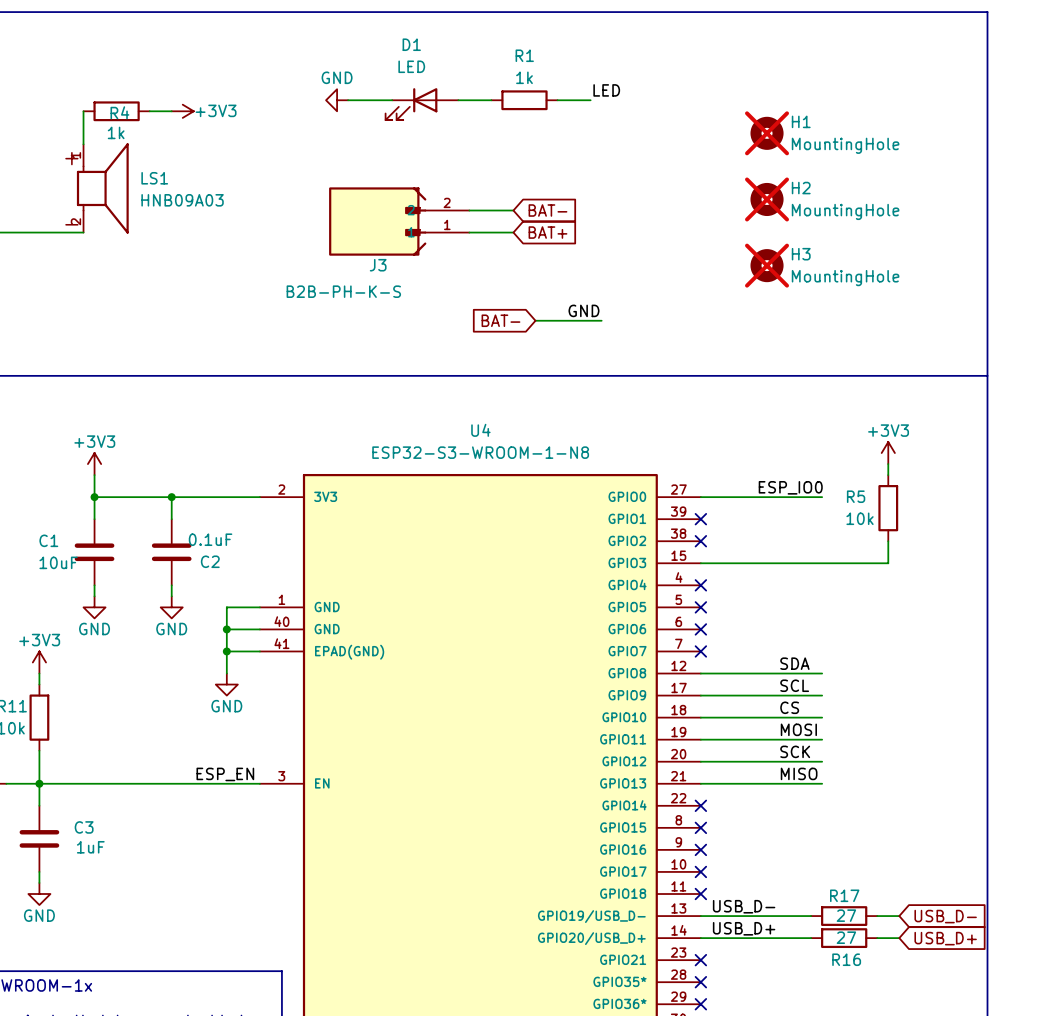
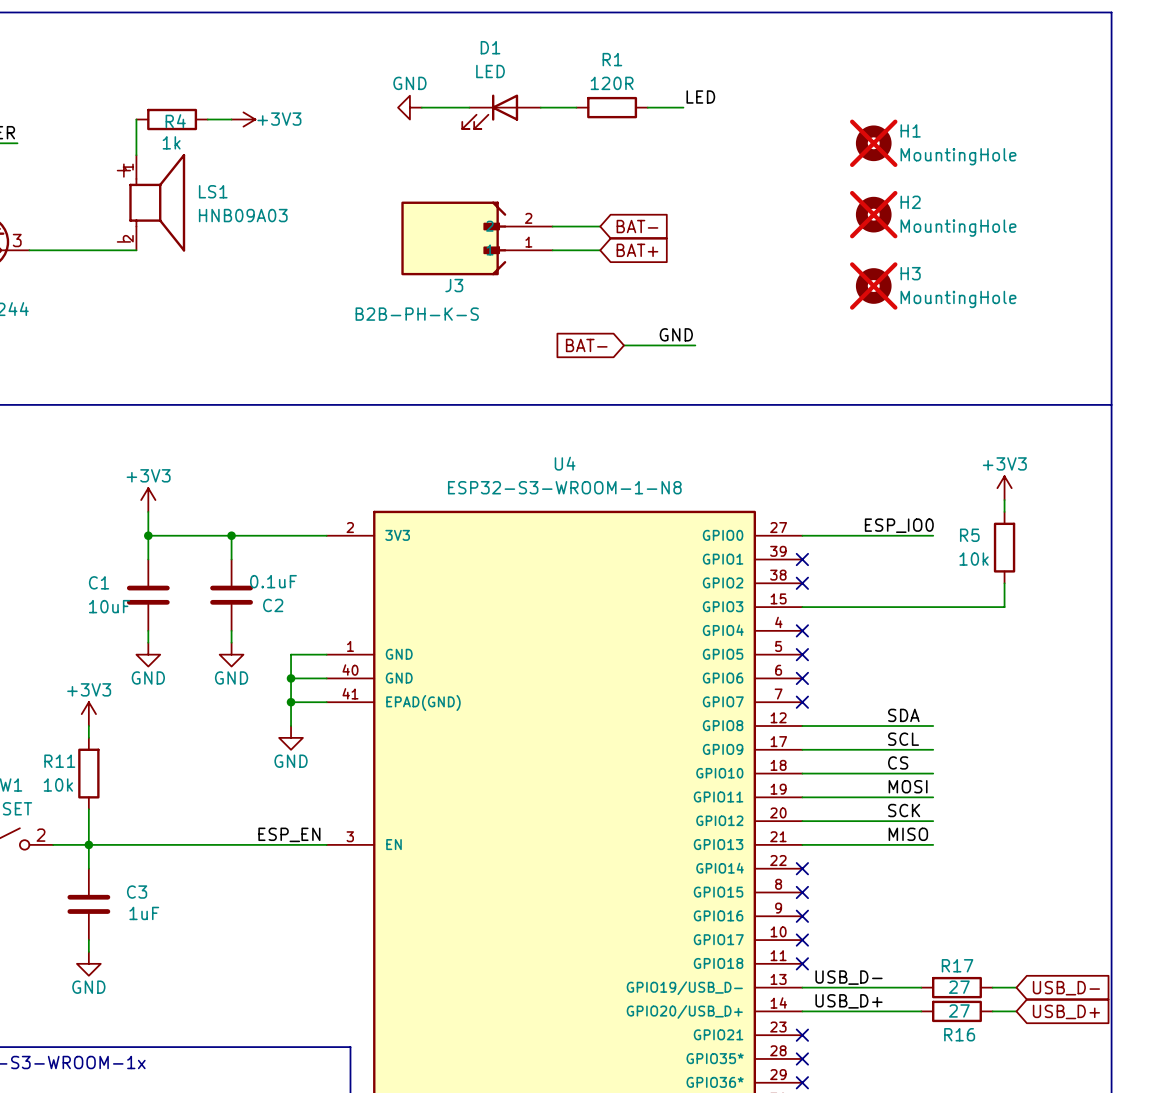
R1 value: 1k (524, 77) -> 120R (612, 83)

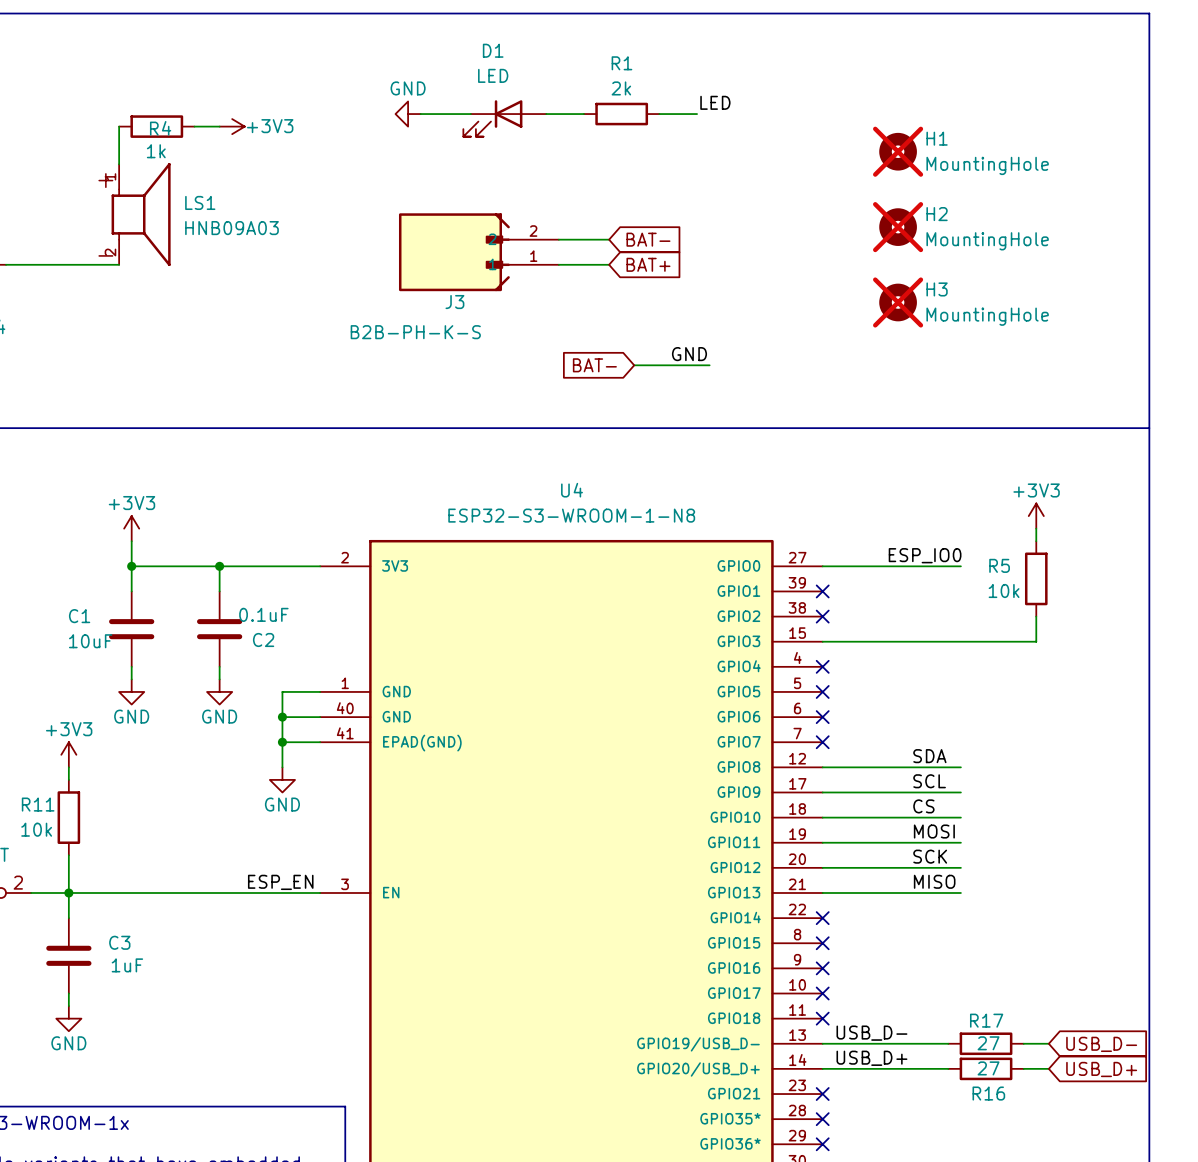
R1 value: 120R (612, 83) -> 2k (621, 88)

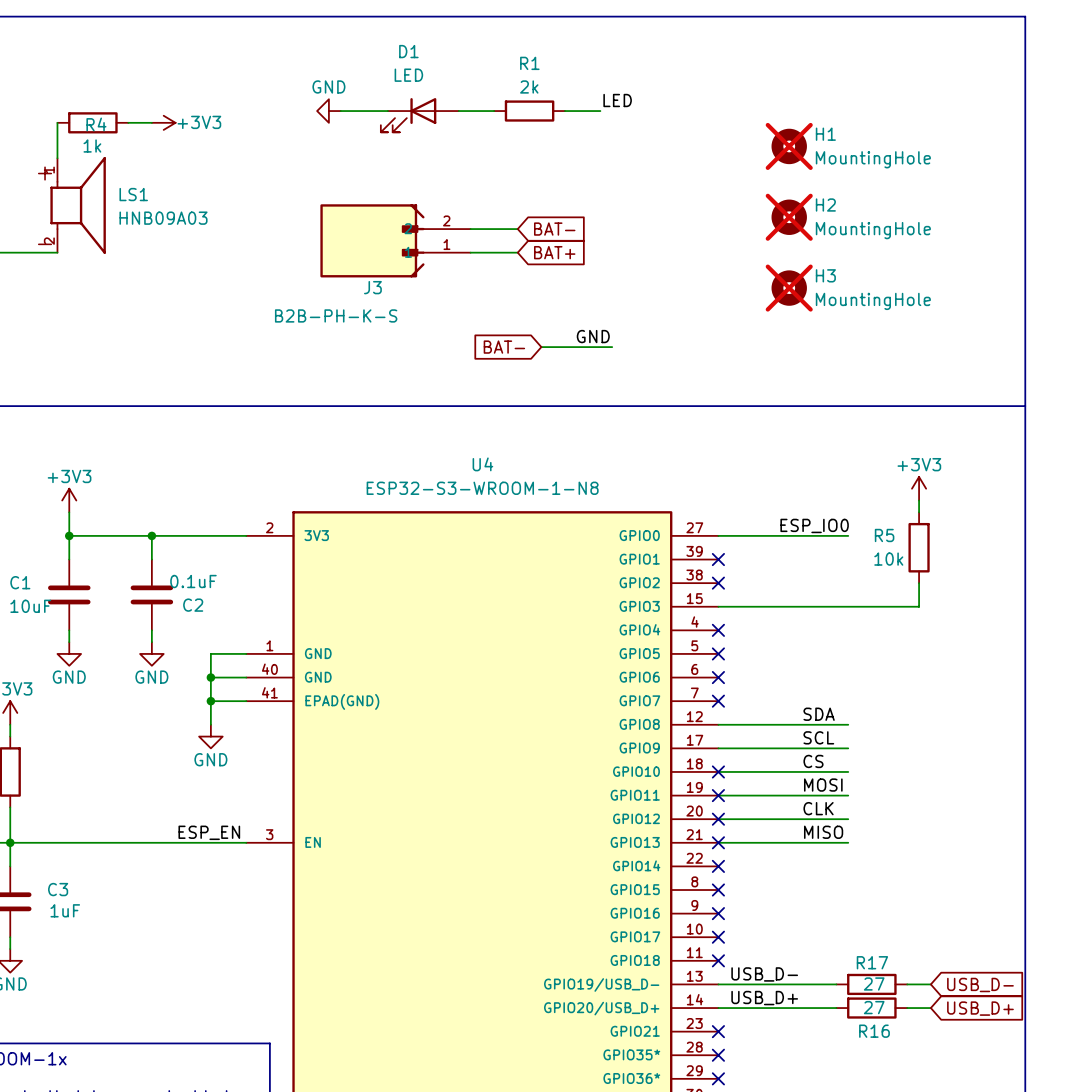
no-connect mark: none -> (718, 771)
no-connect mark: none -> (718, 795)
label: SCK (930, 856) -> CLK (818, 808)
no-connect mark: none -> (718, 819)
no-connect mark: none -> (718, 842)

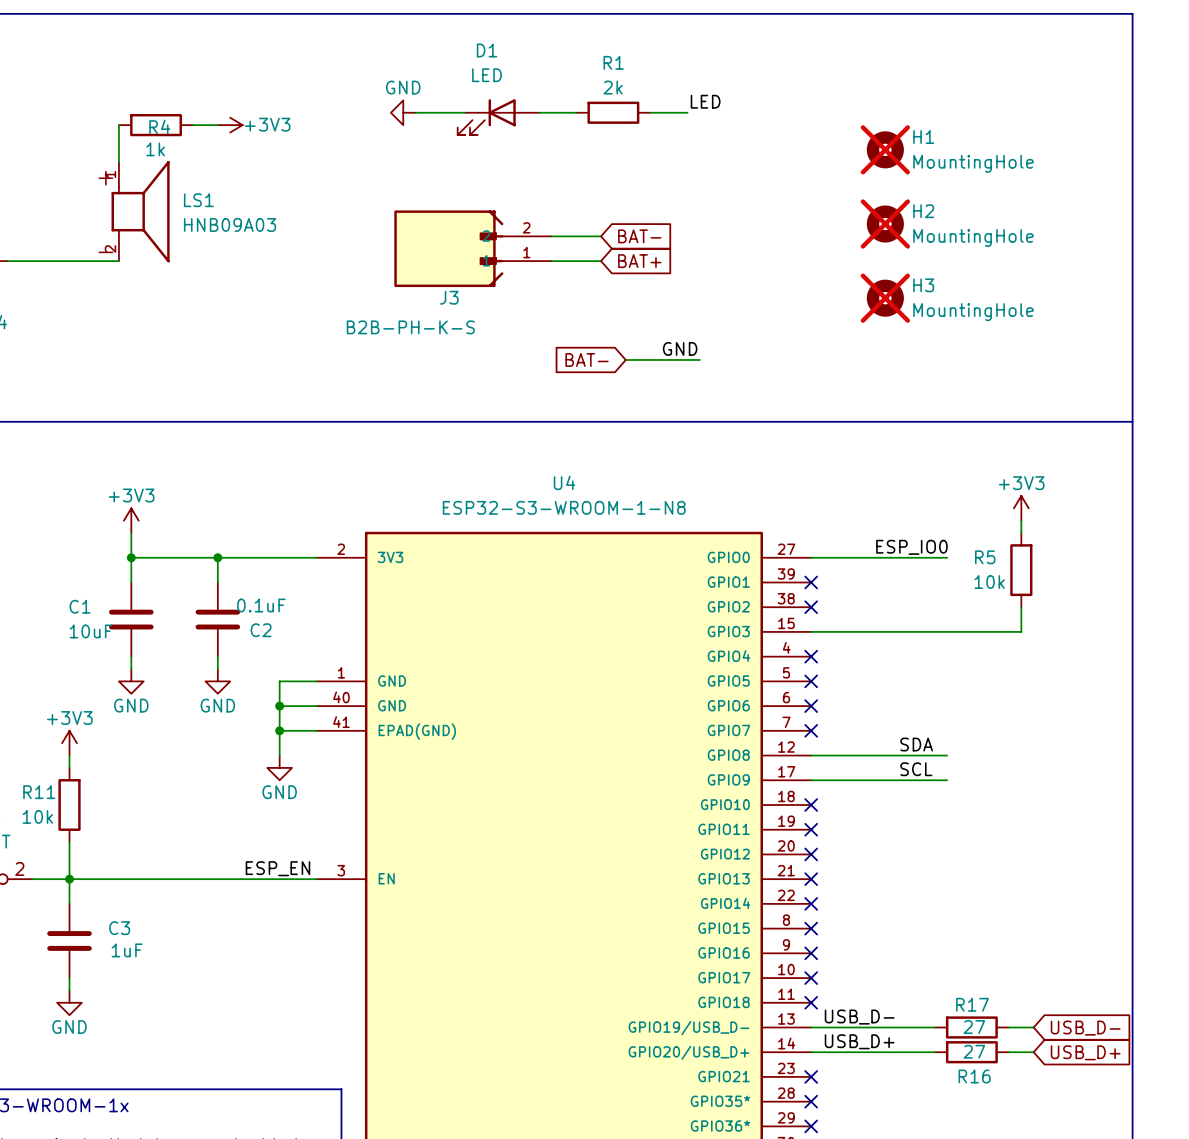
label: CS (813, 761) -> none
wire: (718, 771) (848, 771) -> none
label: MOSI (823, 785) -> none
wire: (718, 795) (848, 795) -> none
label: CLK (818, 808) -> none
wire: (718, 819) (848, 819) -> none
label: MISO (823, 832) -> none
wire: (718, 842) (848, 842) -> none

